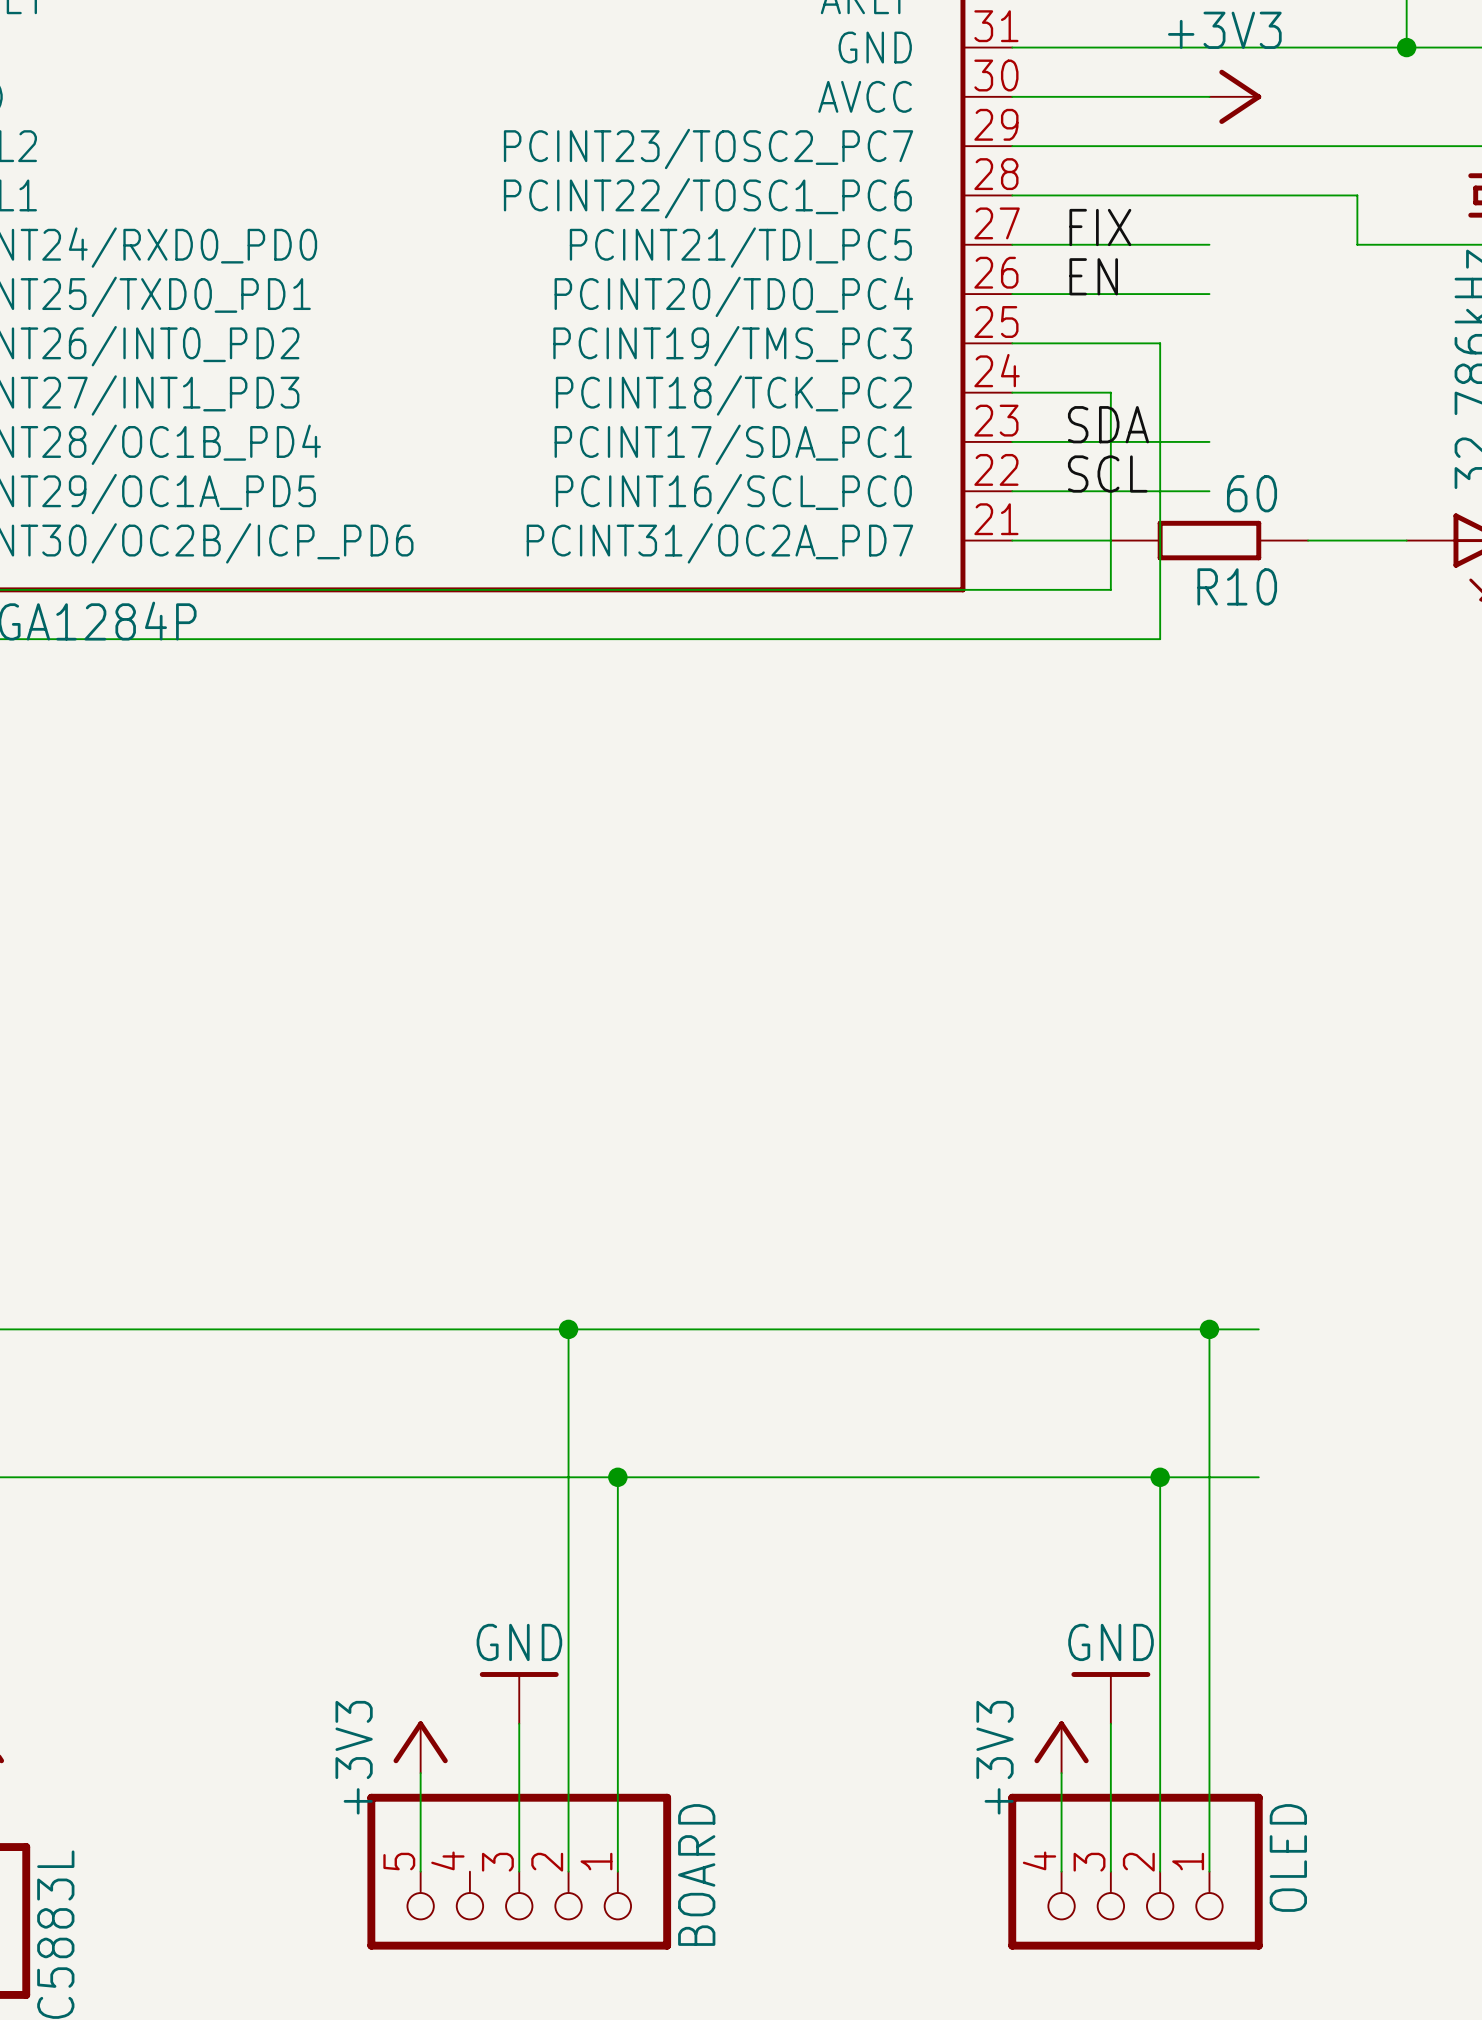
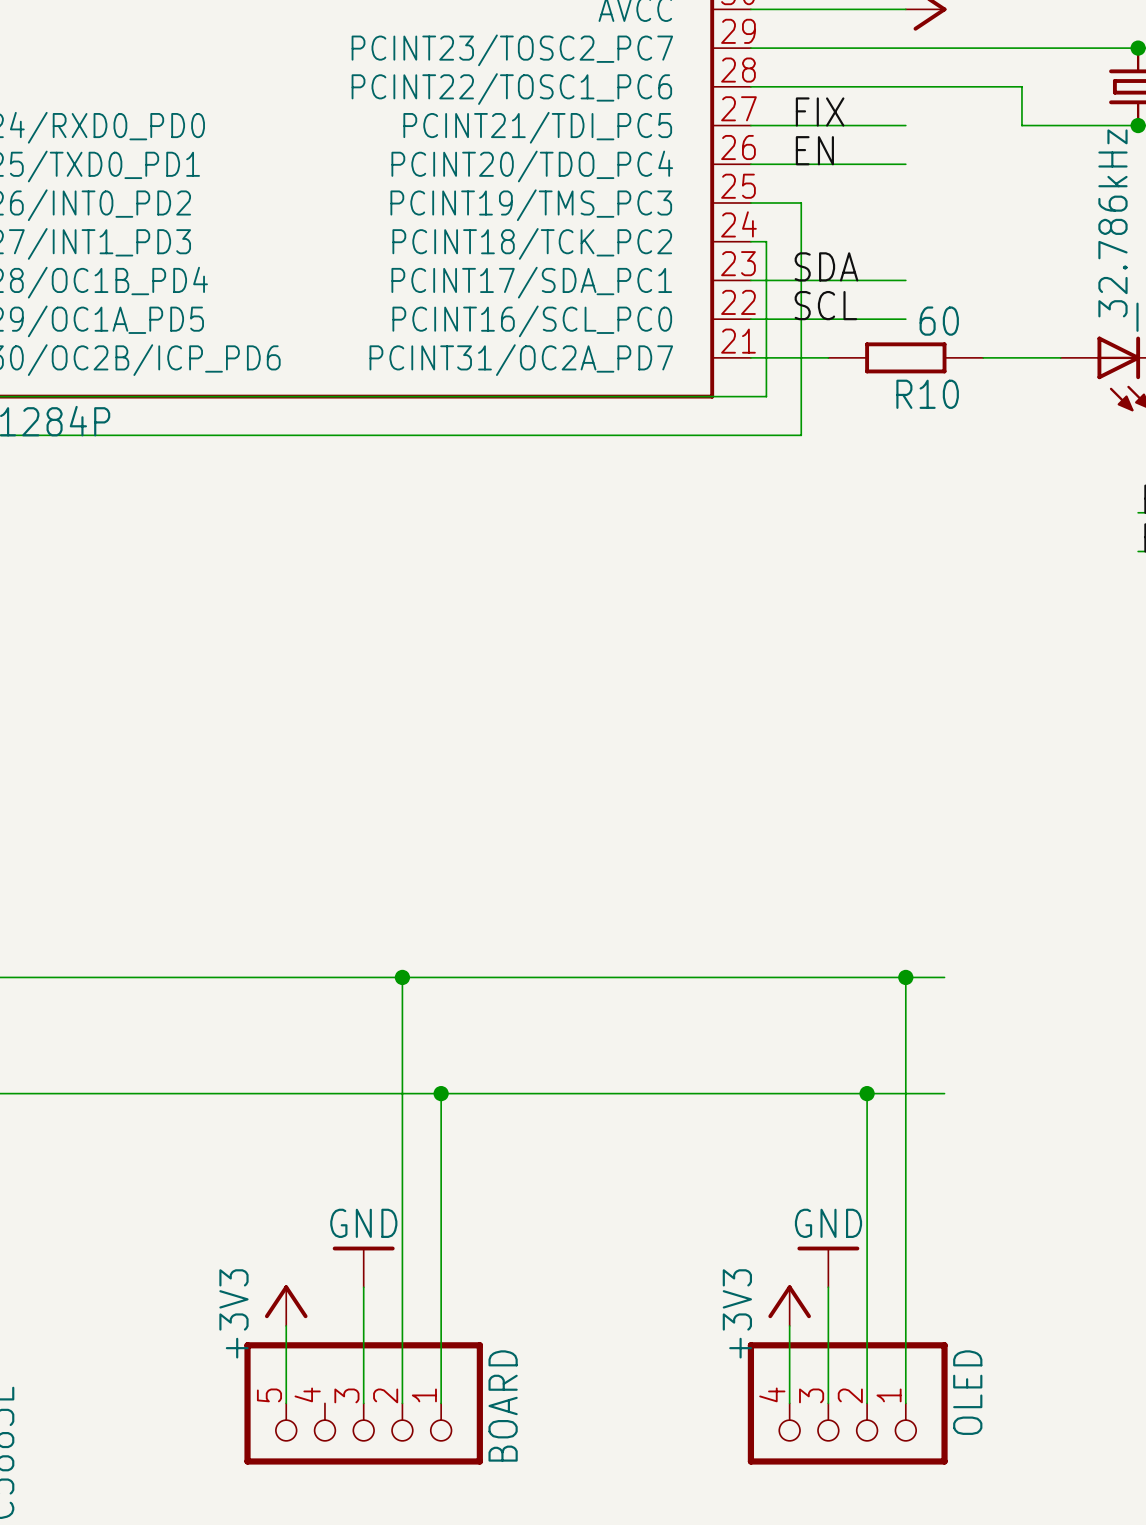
wire: (1076, 343) (1160, 343) (1160, 639) (1076, 639) -> (801, 202) (801, 435)
wire: (1031, 392) (1110, 392) (1110, 589) (1031, 589) -> (766, 241) (766, 396)

